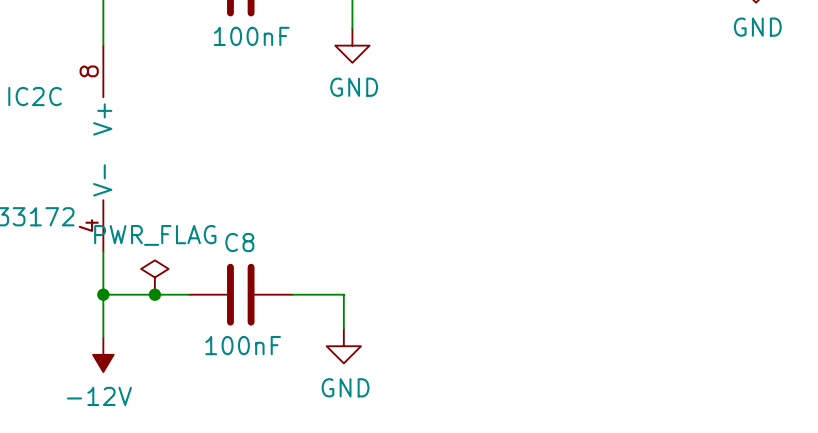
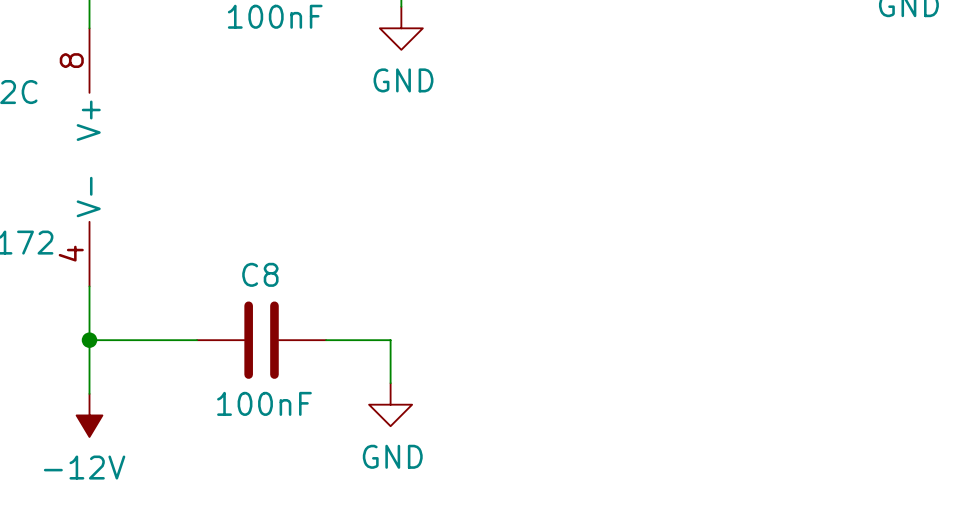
power symbol: PWR_FLAG (154, 277) -> none
junction: (154, 294) -> none

